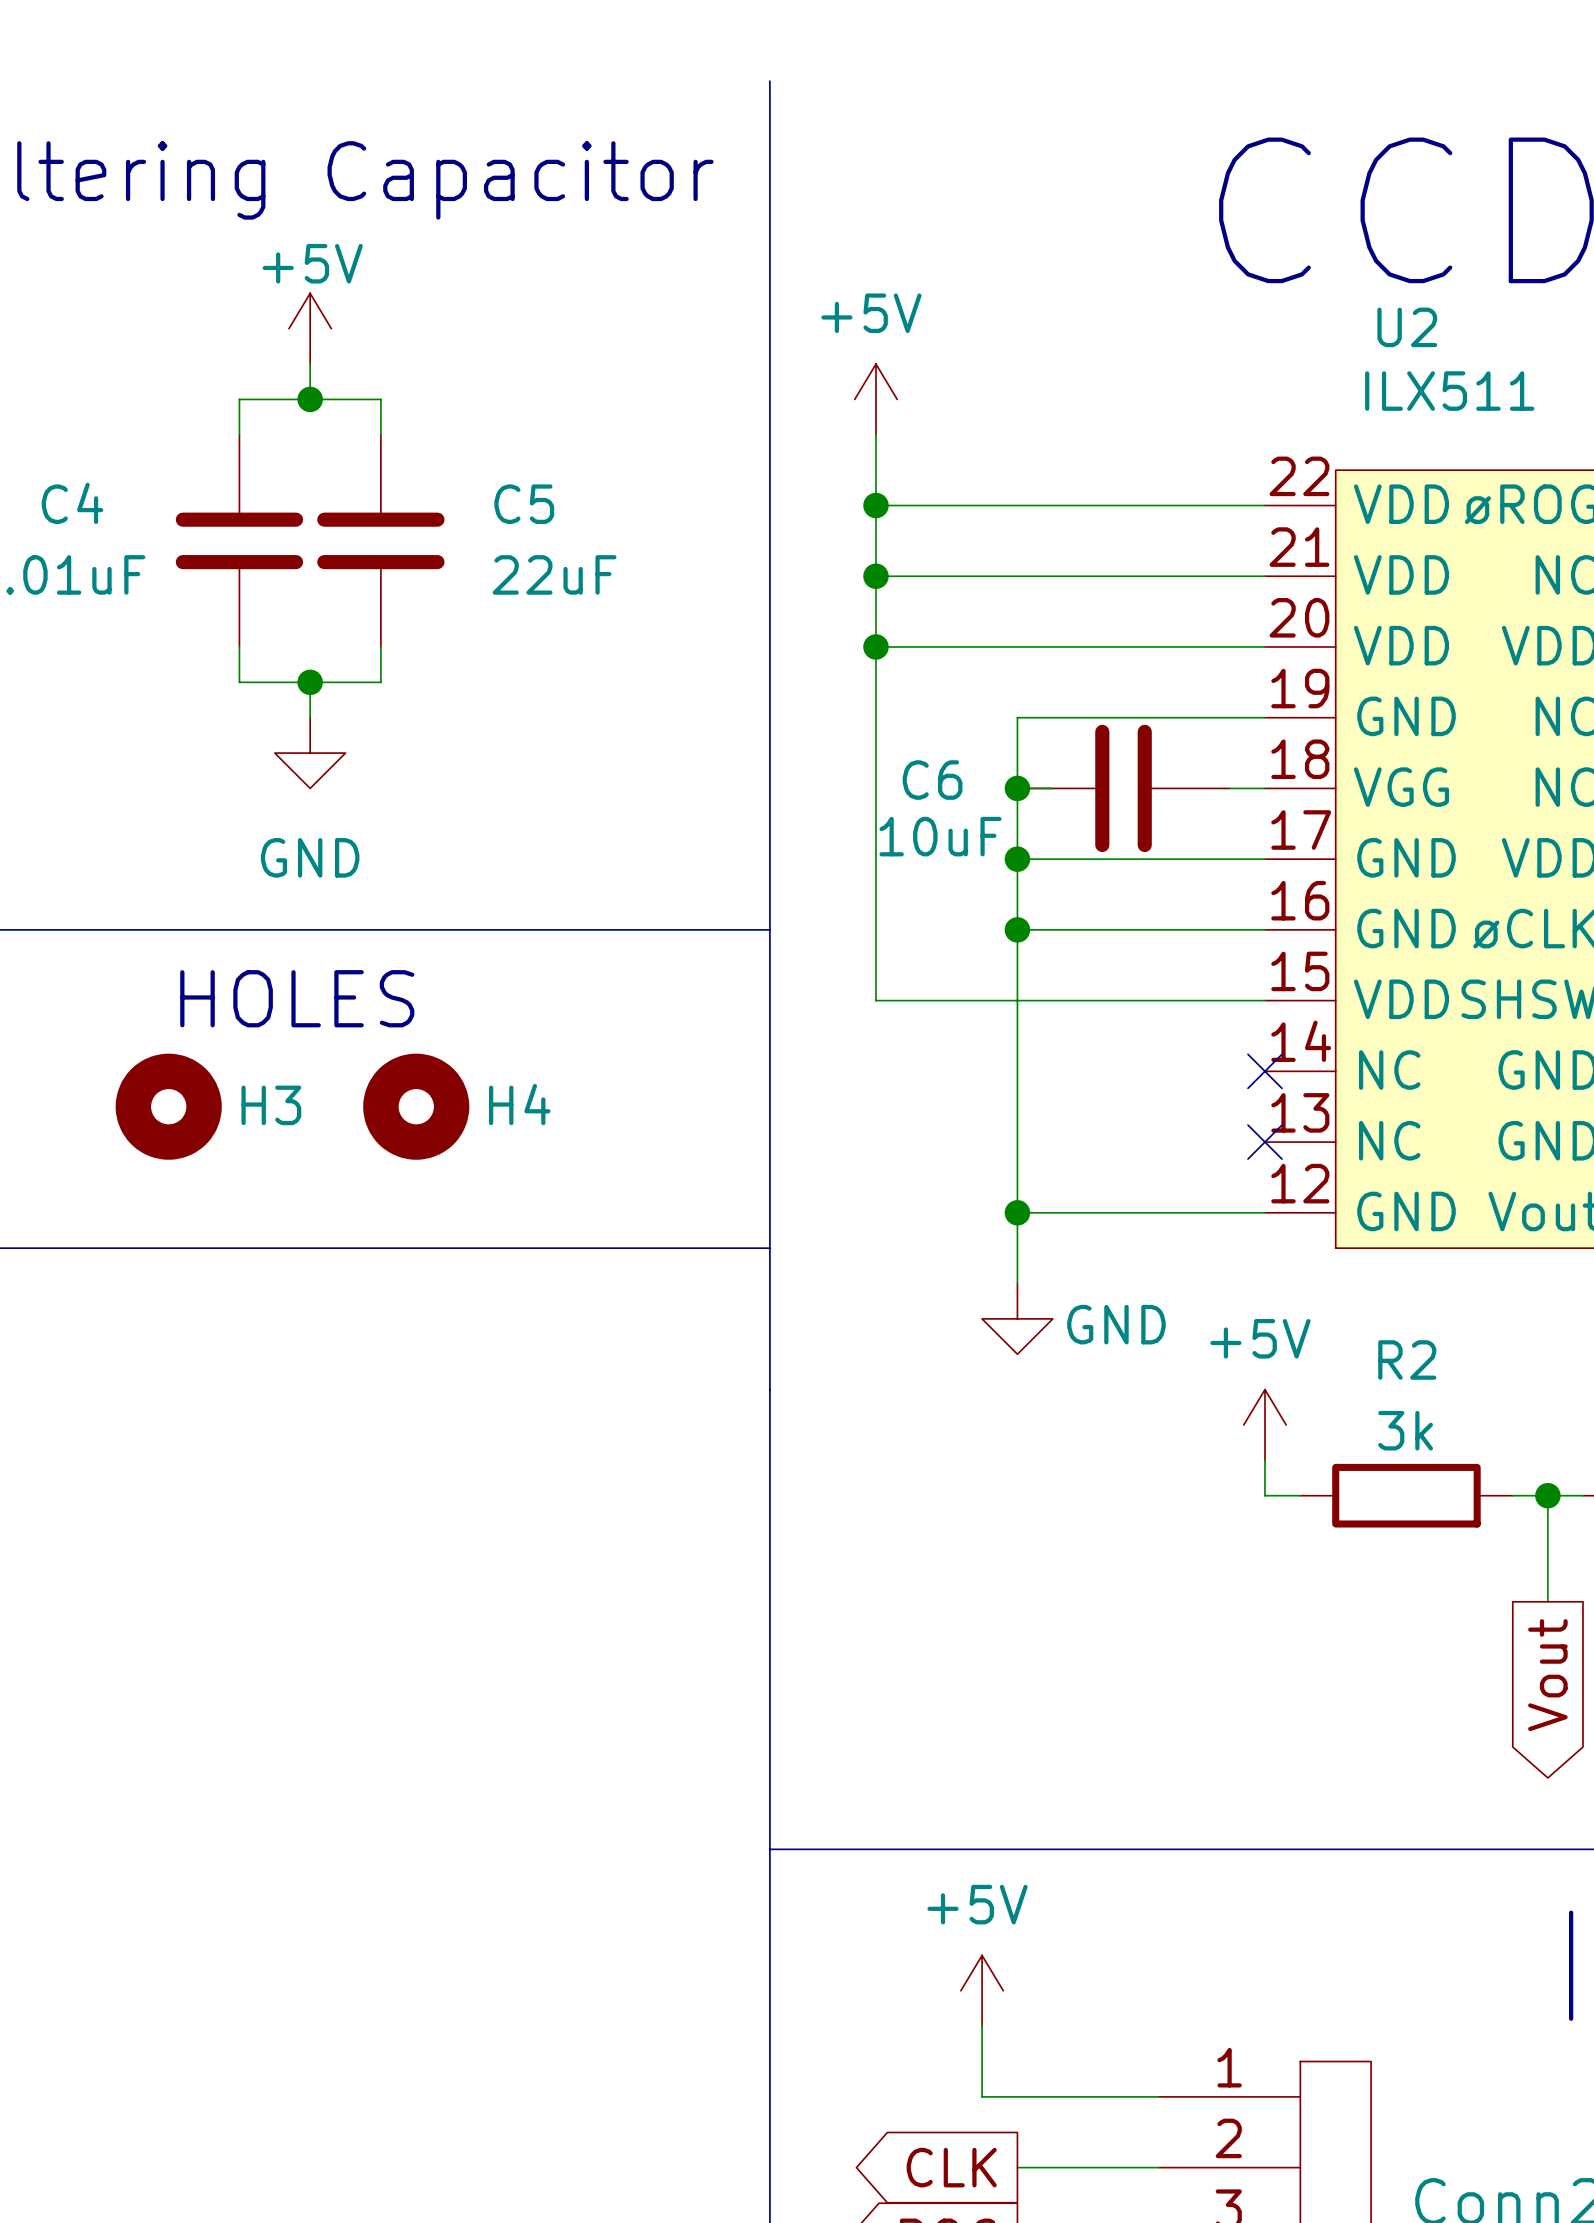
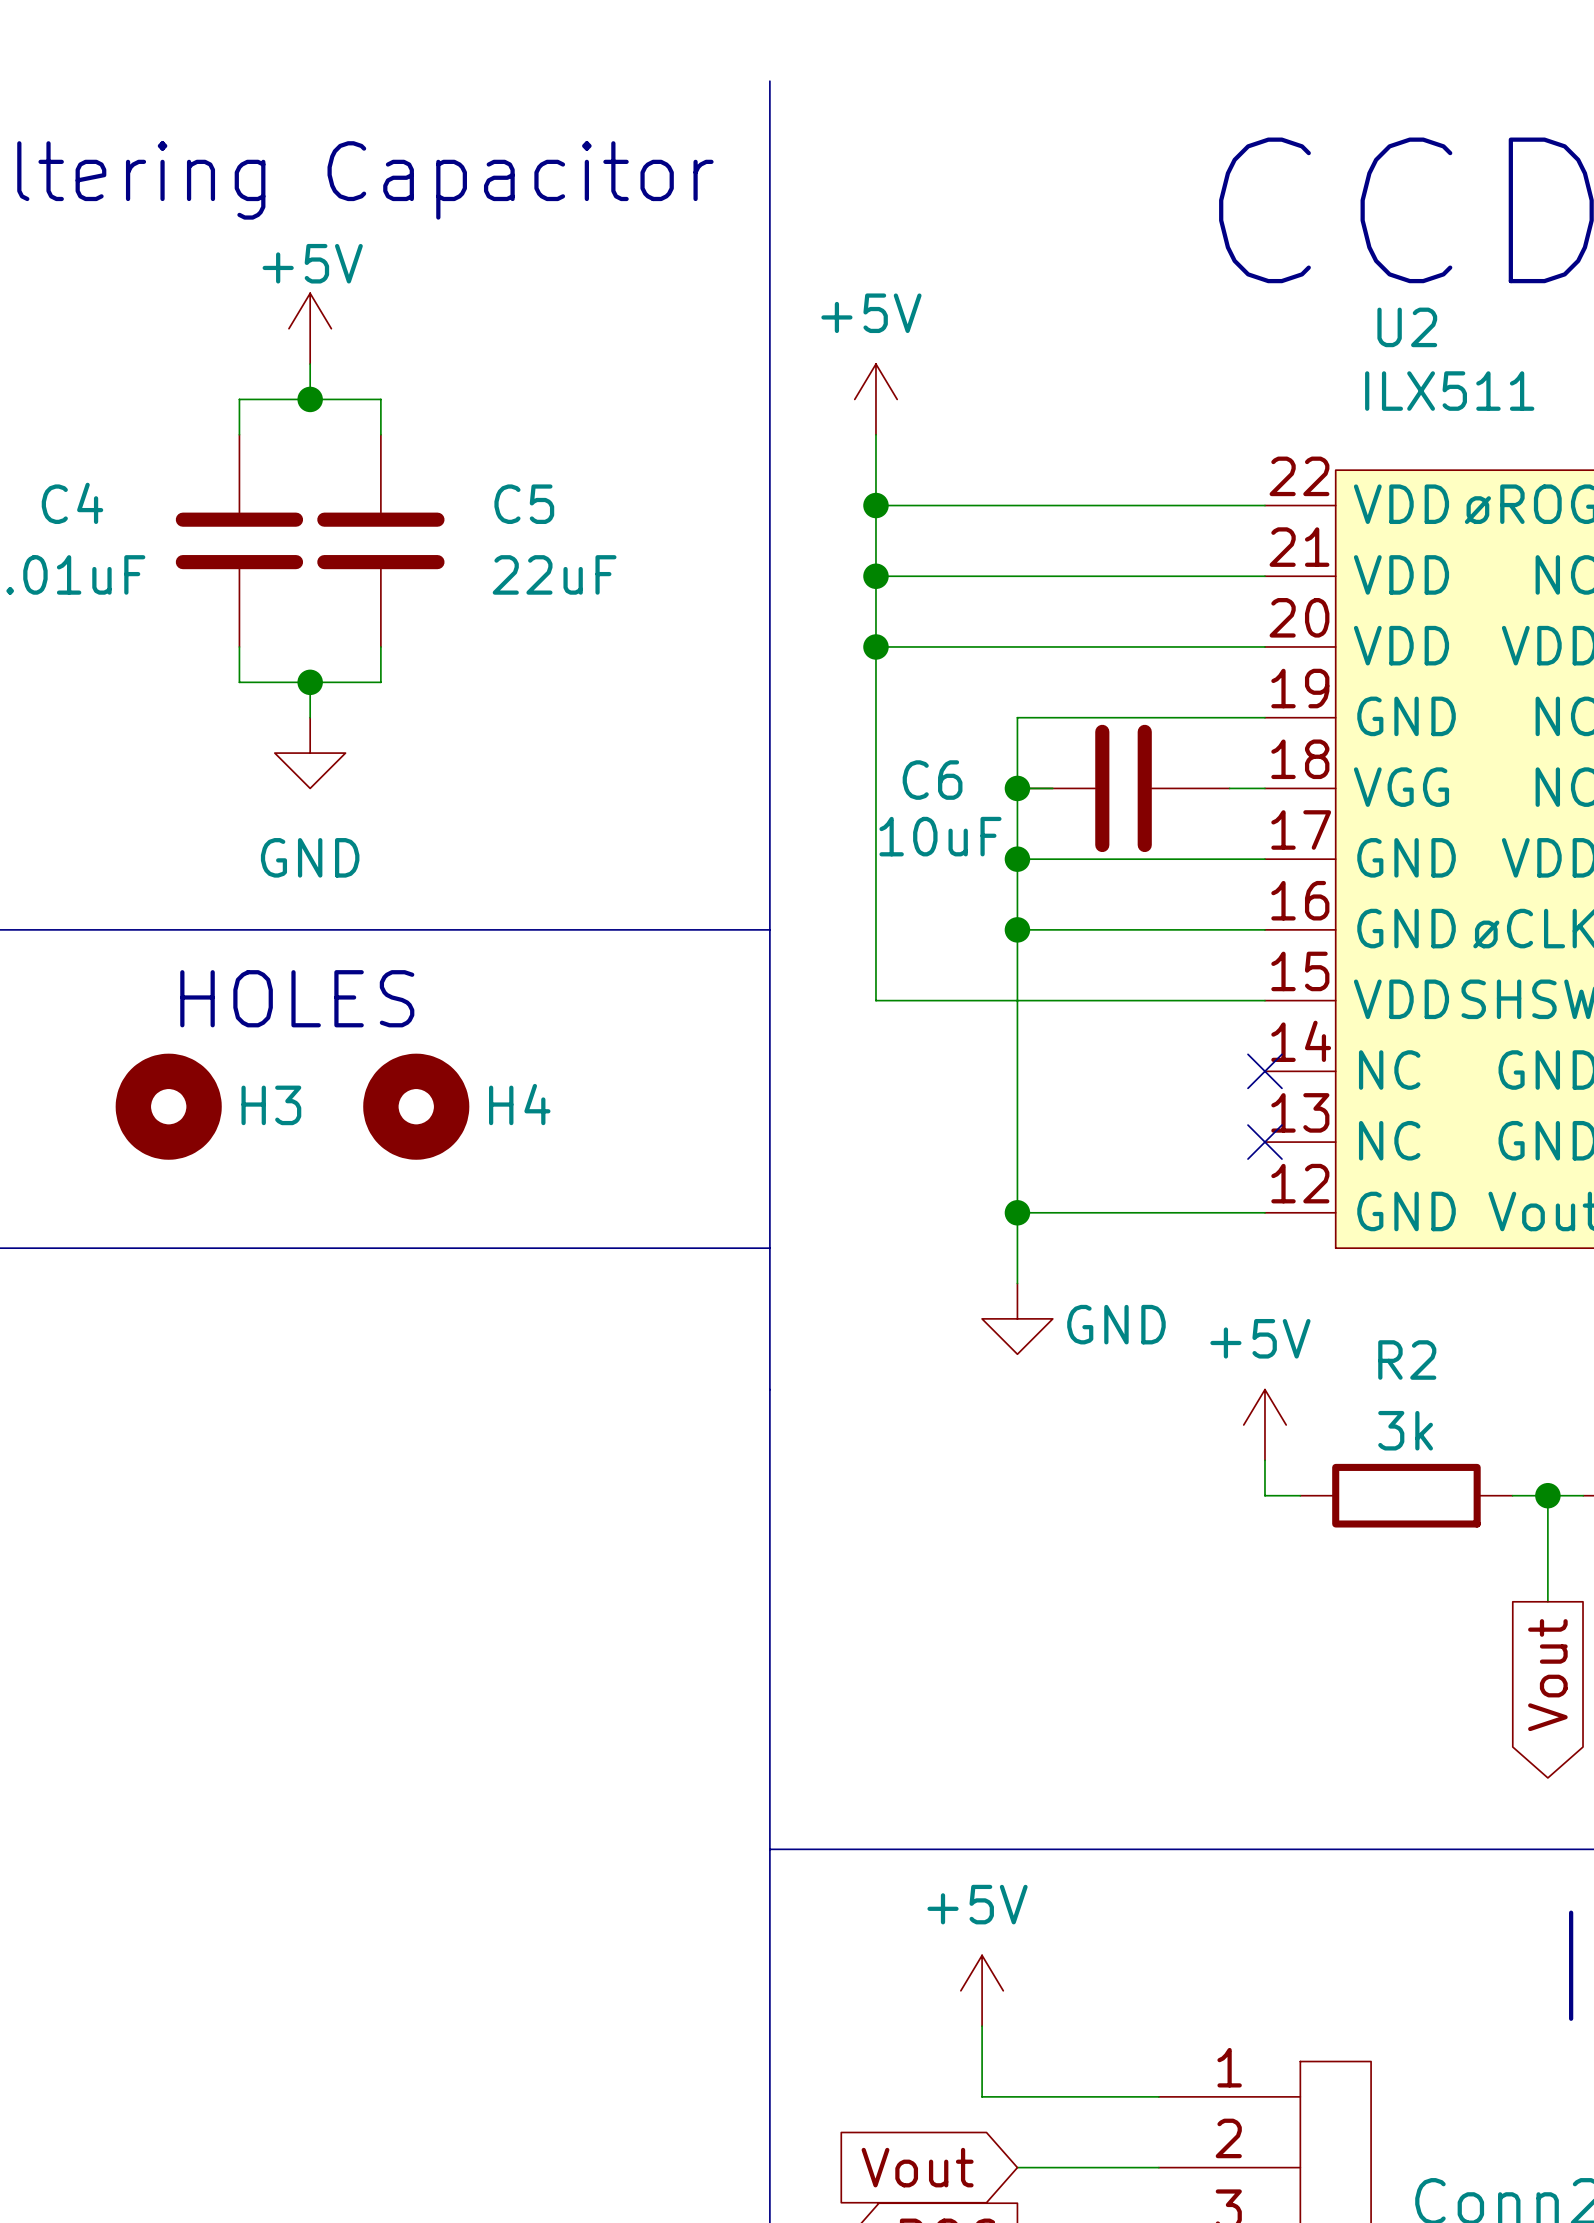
global label shape: output (951, 2167) -> input (917, 2167)
global label: CLK (951, 2167) -> Vout (917, 2167)

